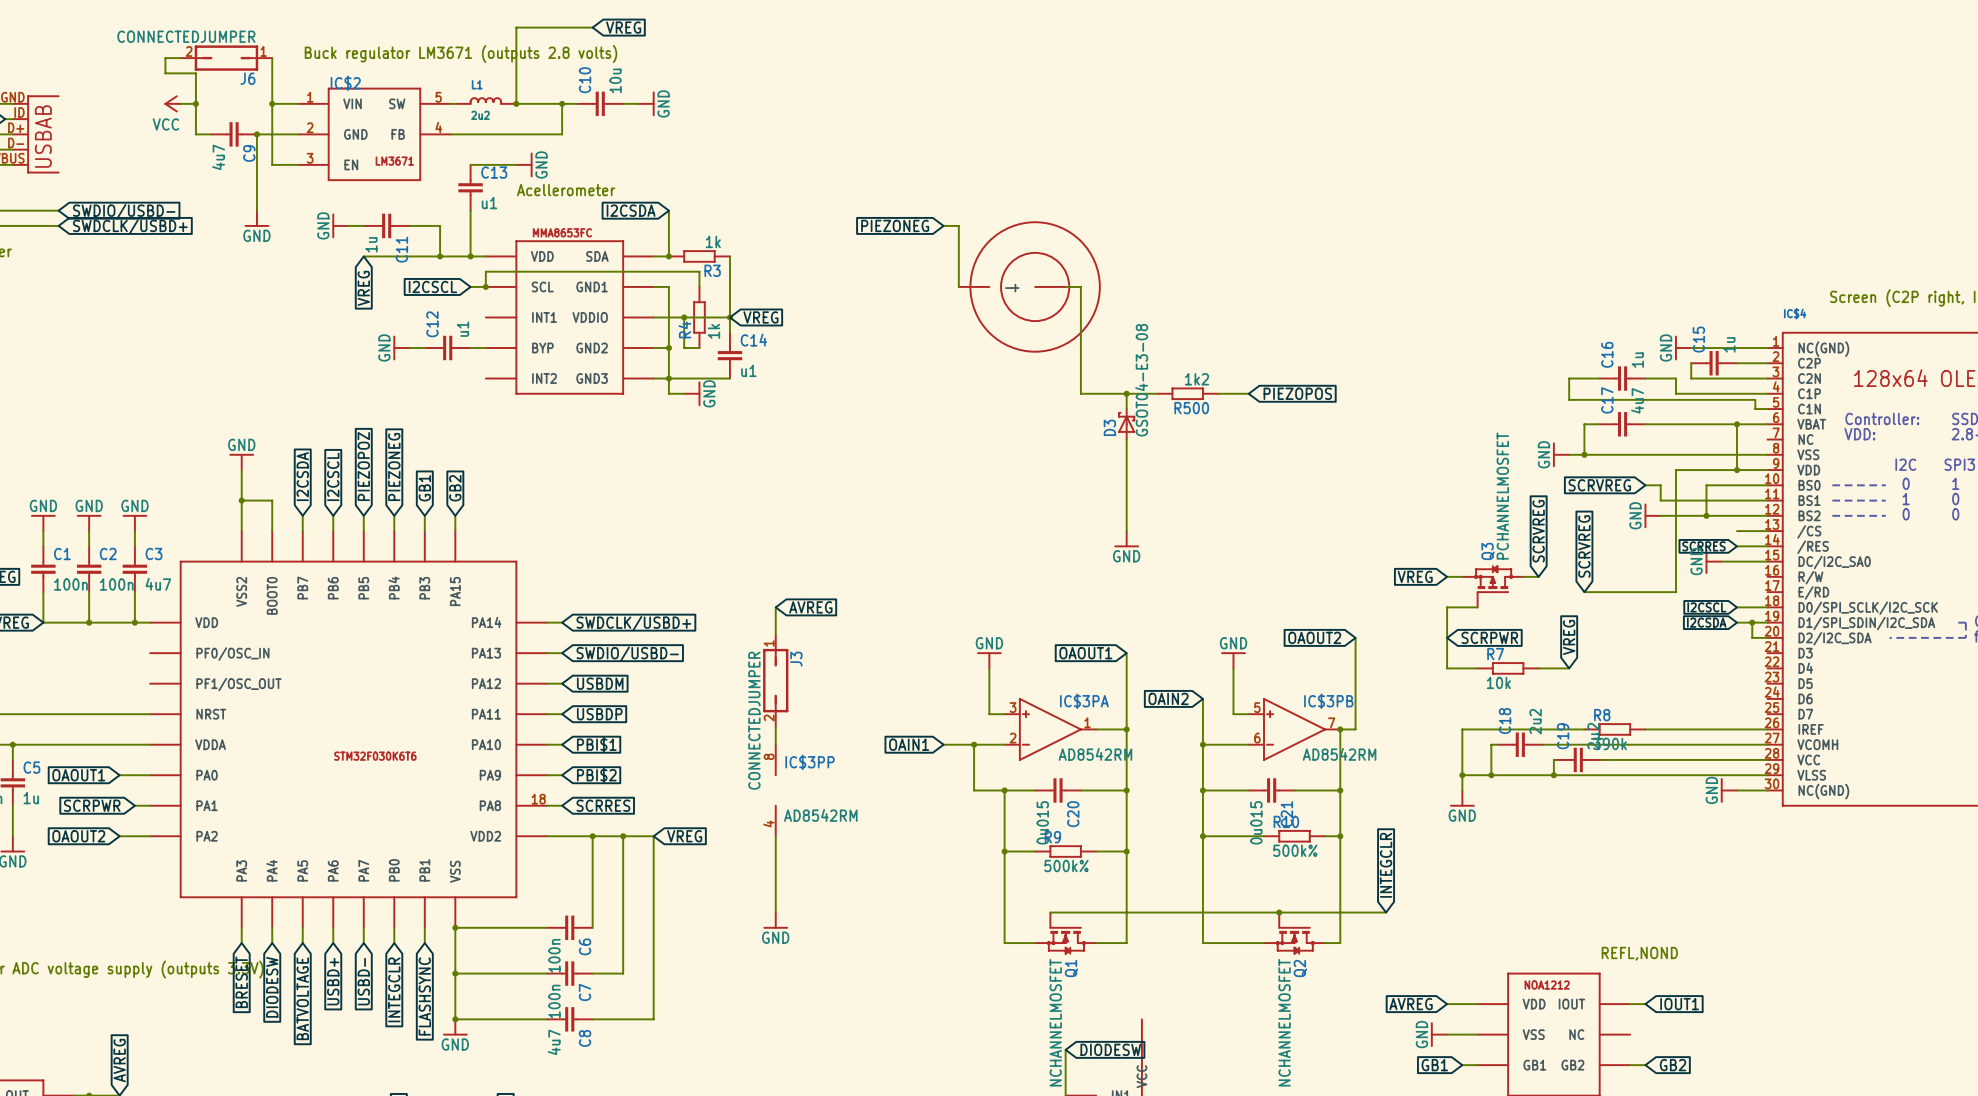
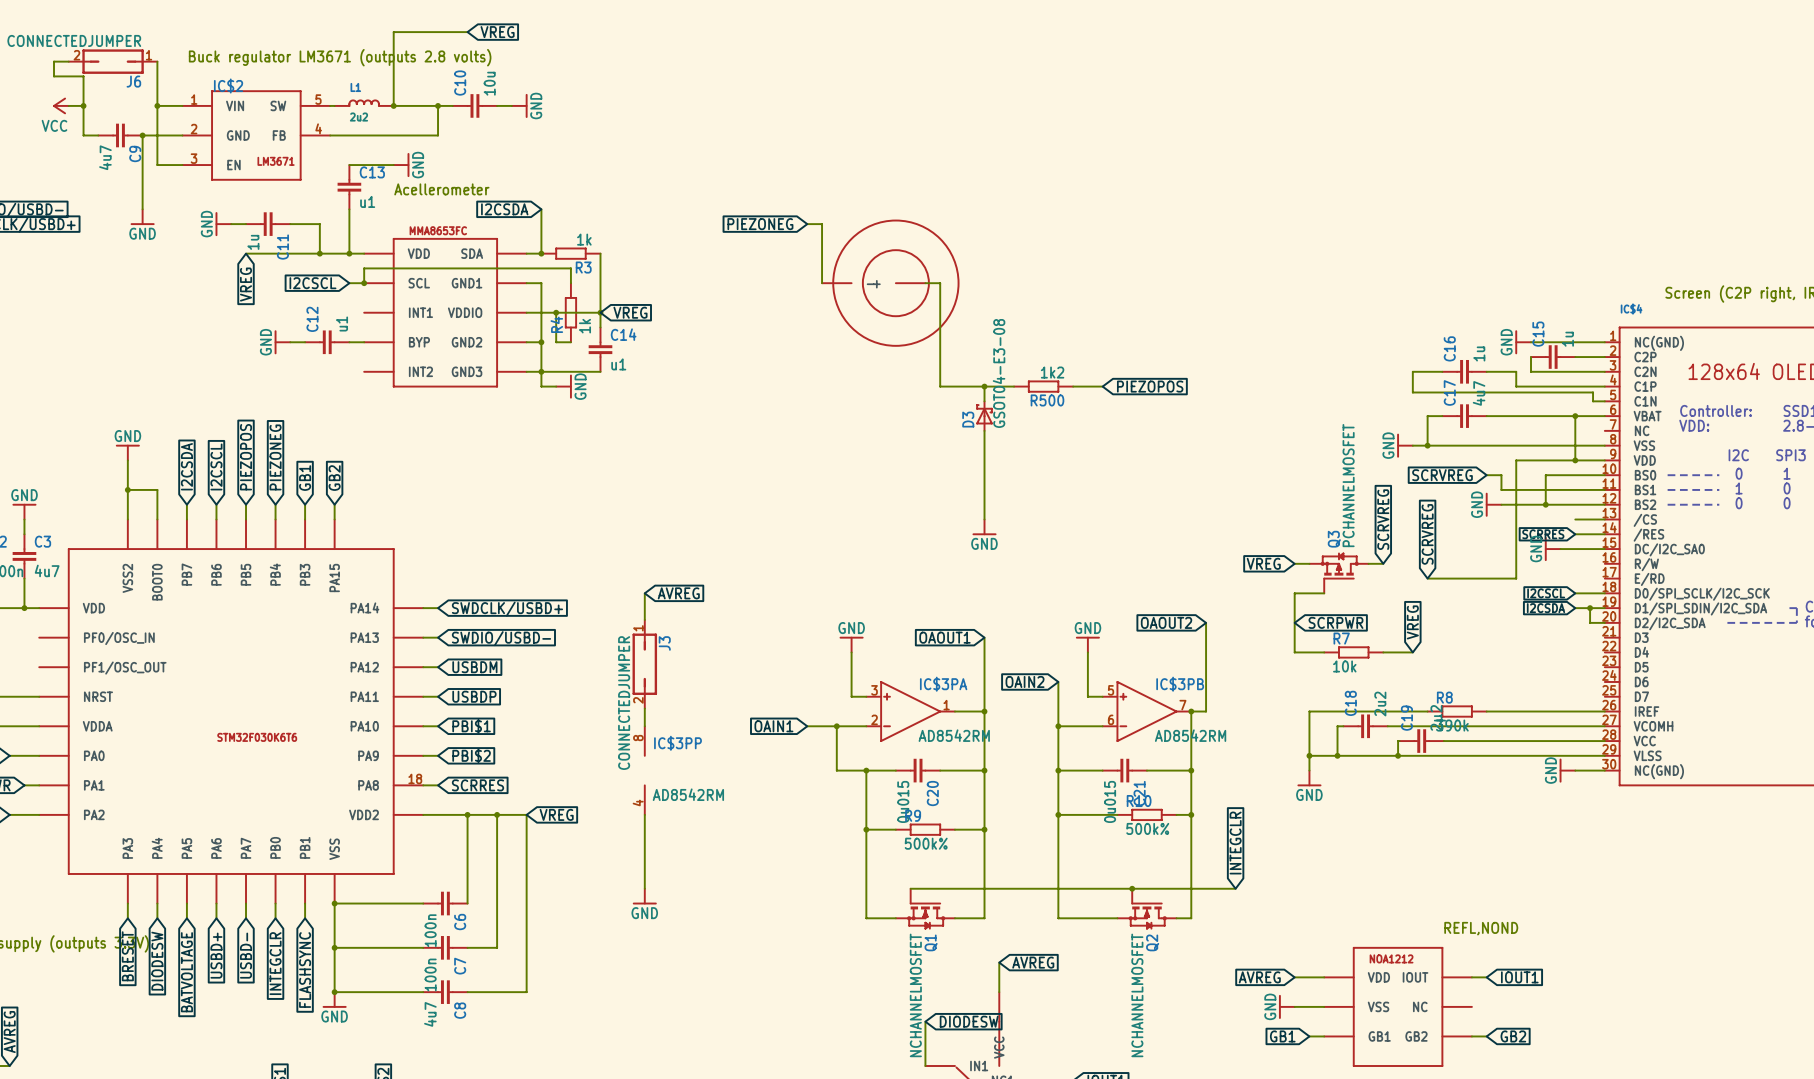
global label: PIEZOPOZ (363, 466) -> PIEZOPOS (246, 457)
wire: none -> (999, 962) (999, 992)
global label: none -> AVREG (1033, 962)

